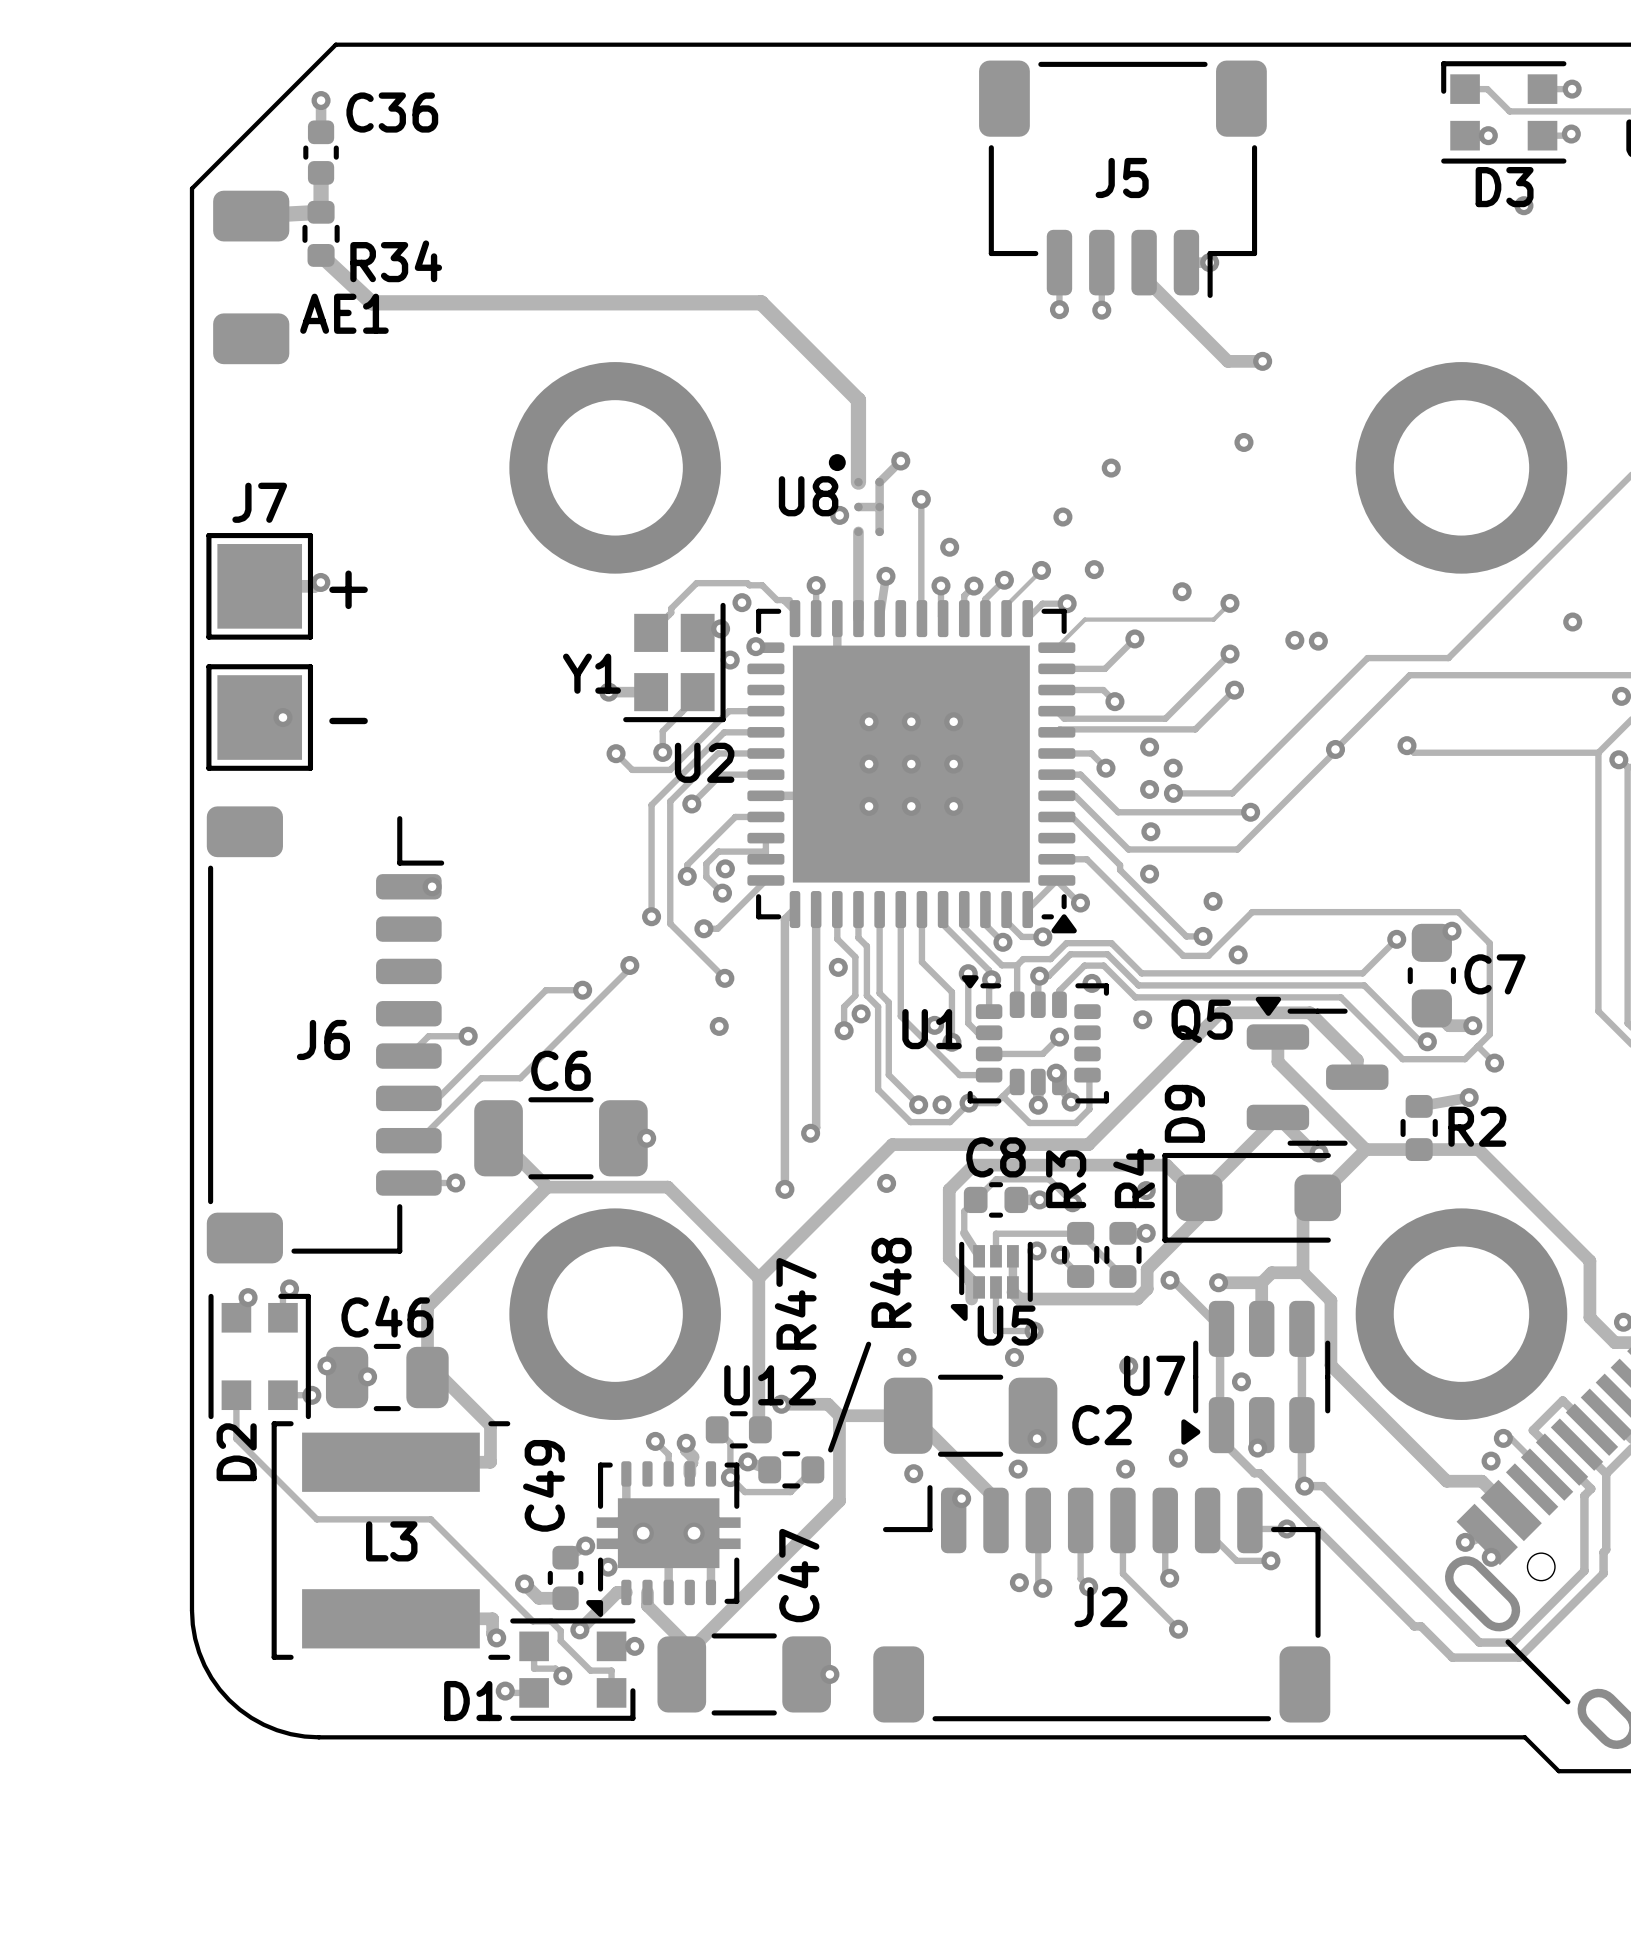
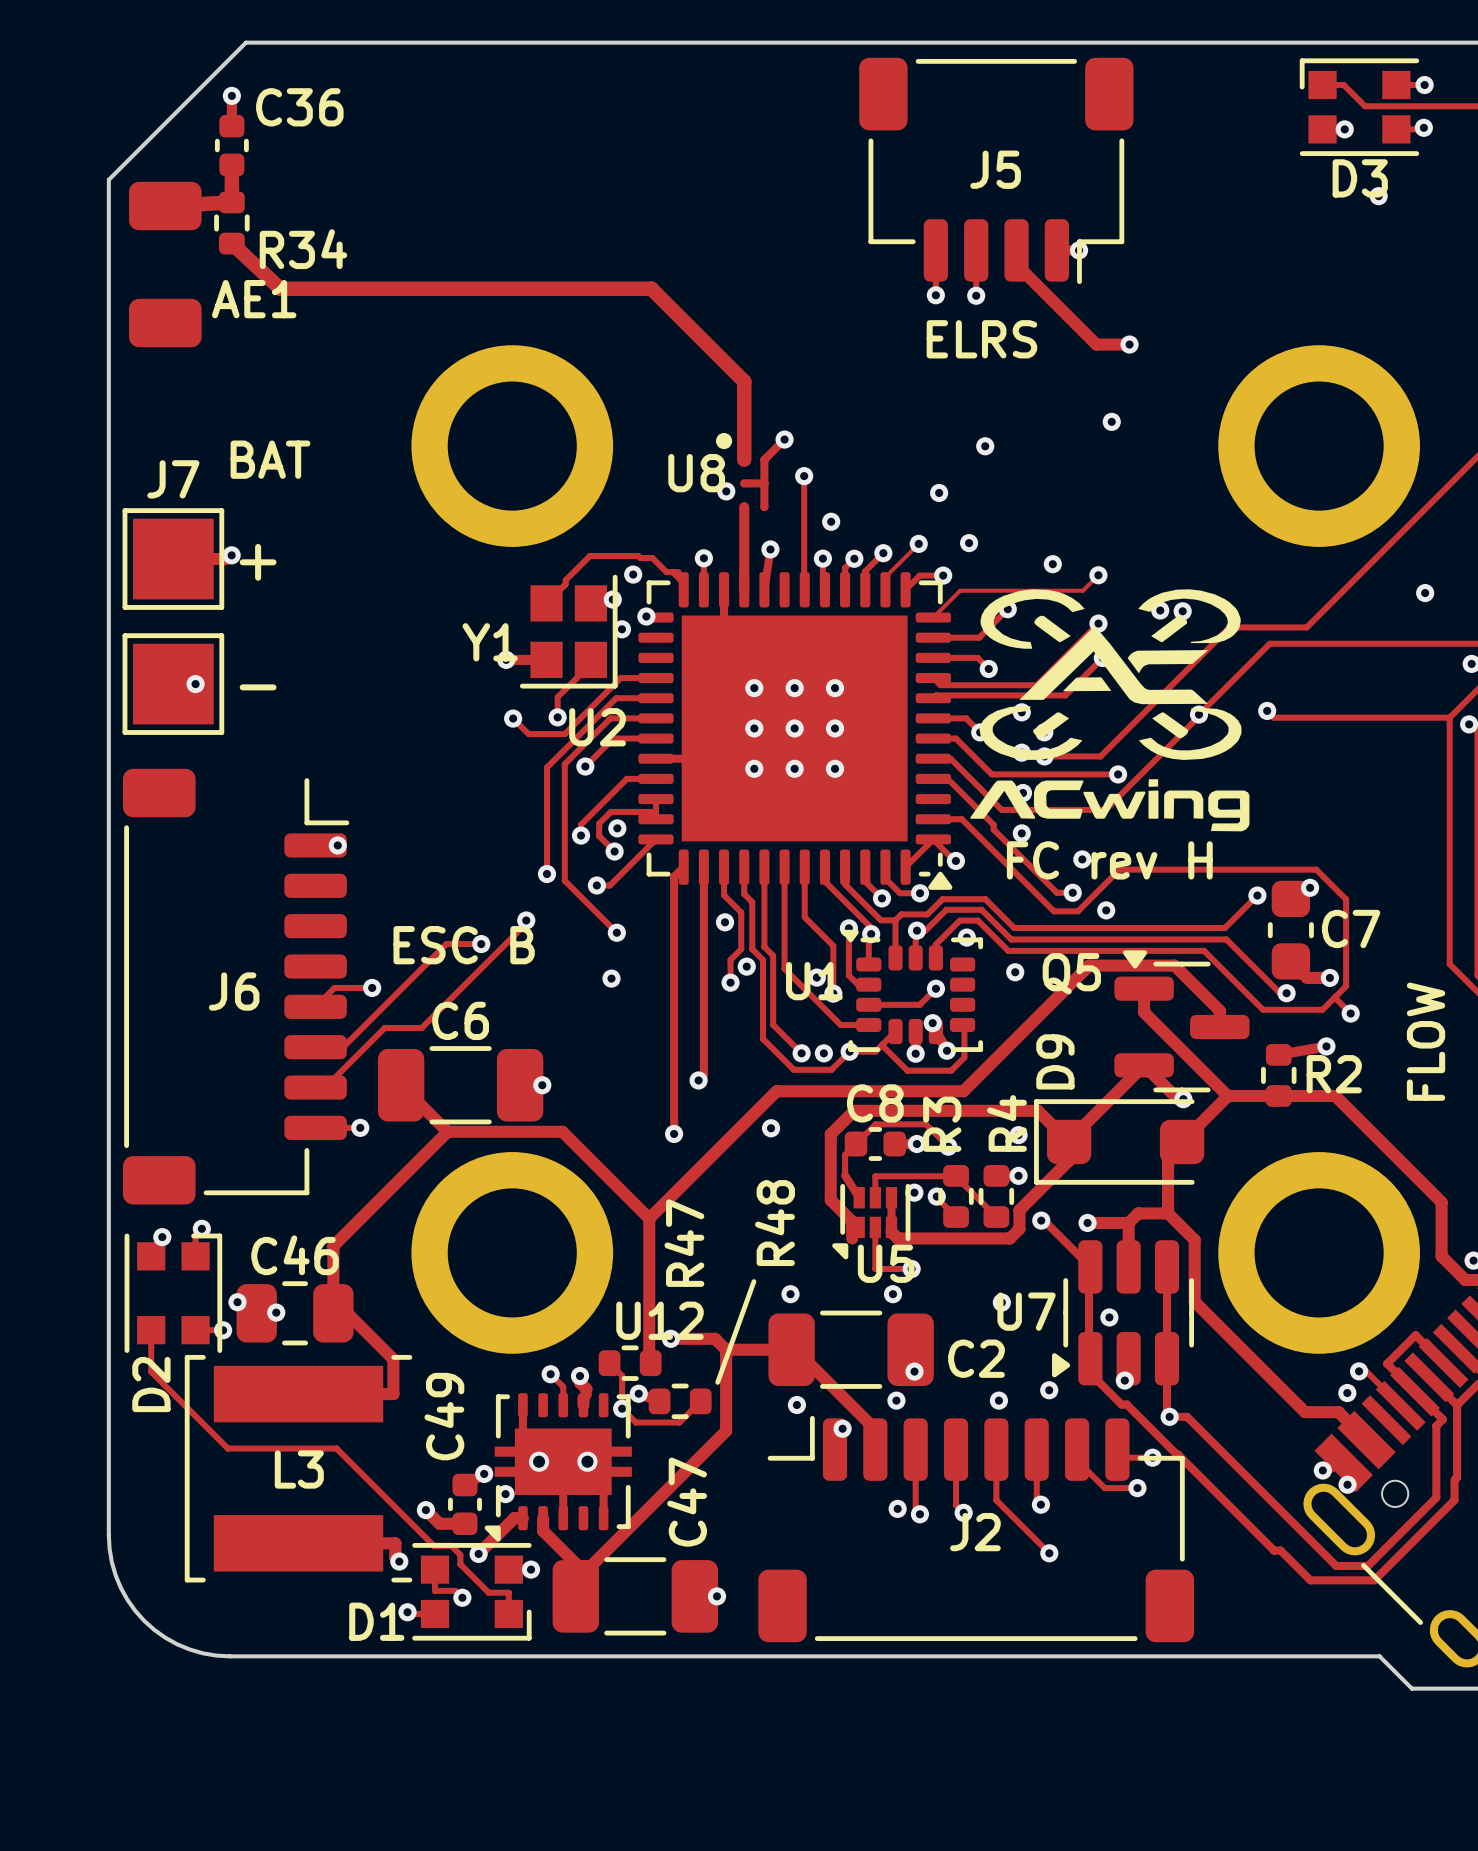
text: none -> ELRS (981, 339)
text: none -> BAT (270, 459)
drawing: none -> [970, 589, 1250, 832]
text: none -> FC rev H (1109, 860)
text: none -> ESC B (464, 945)
text: none -> FLOW (1426, 1041)

